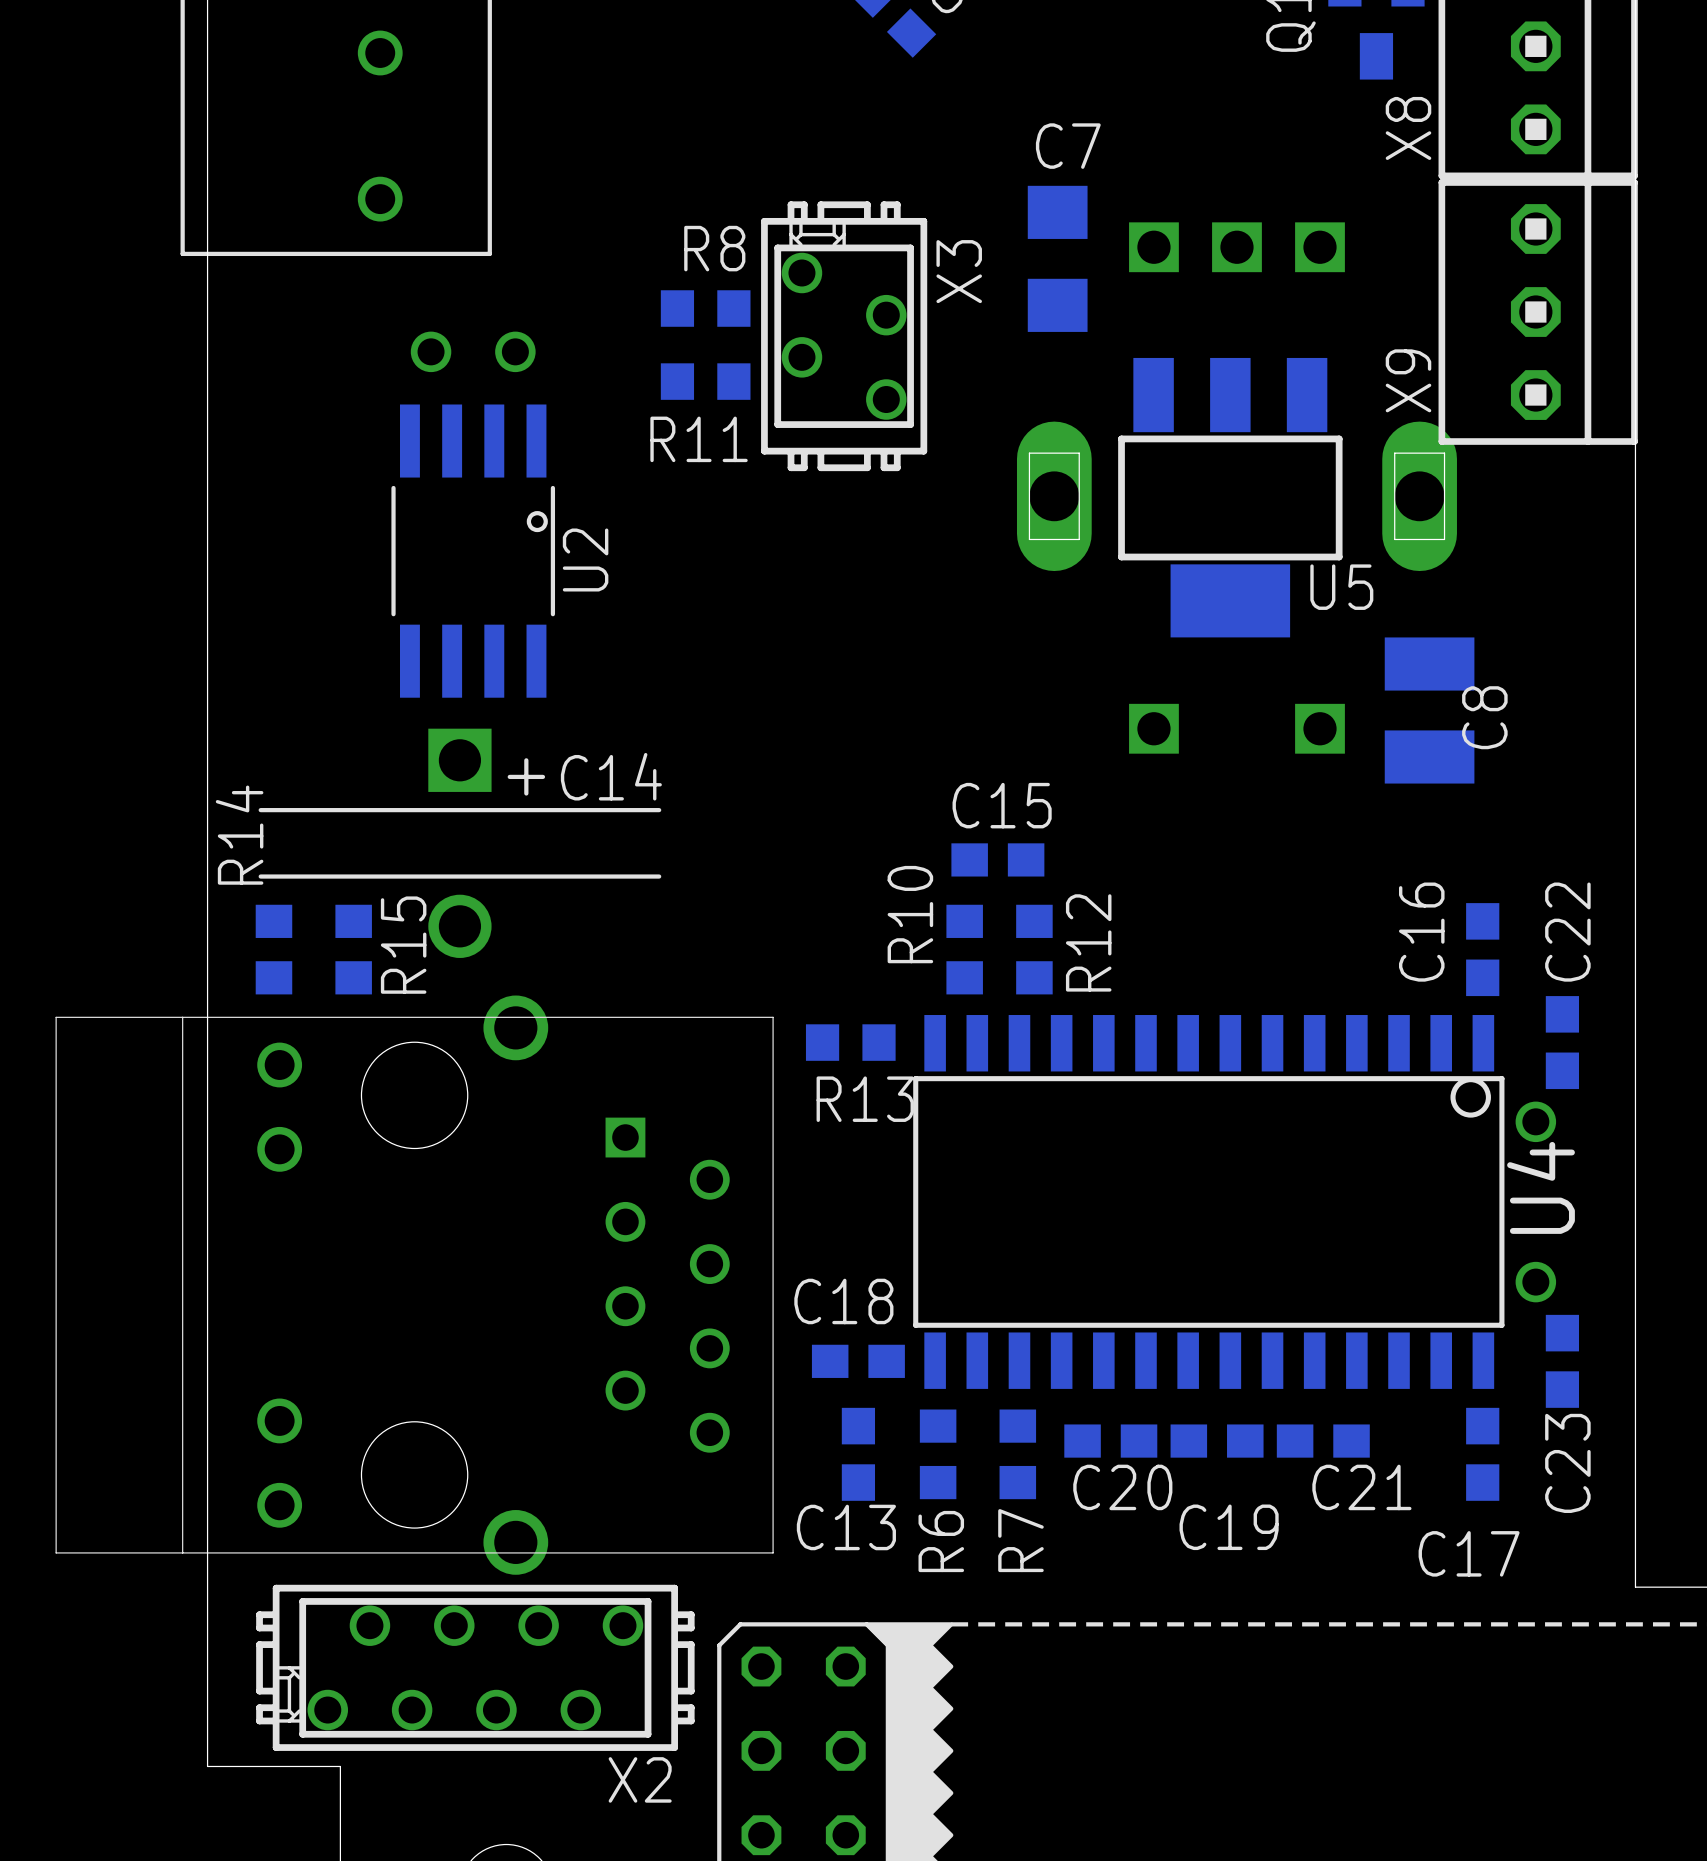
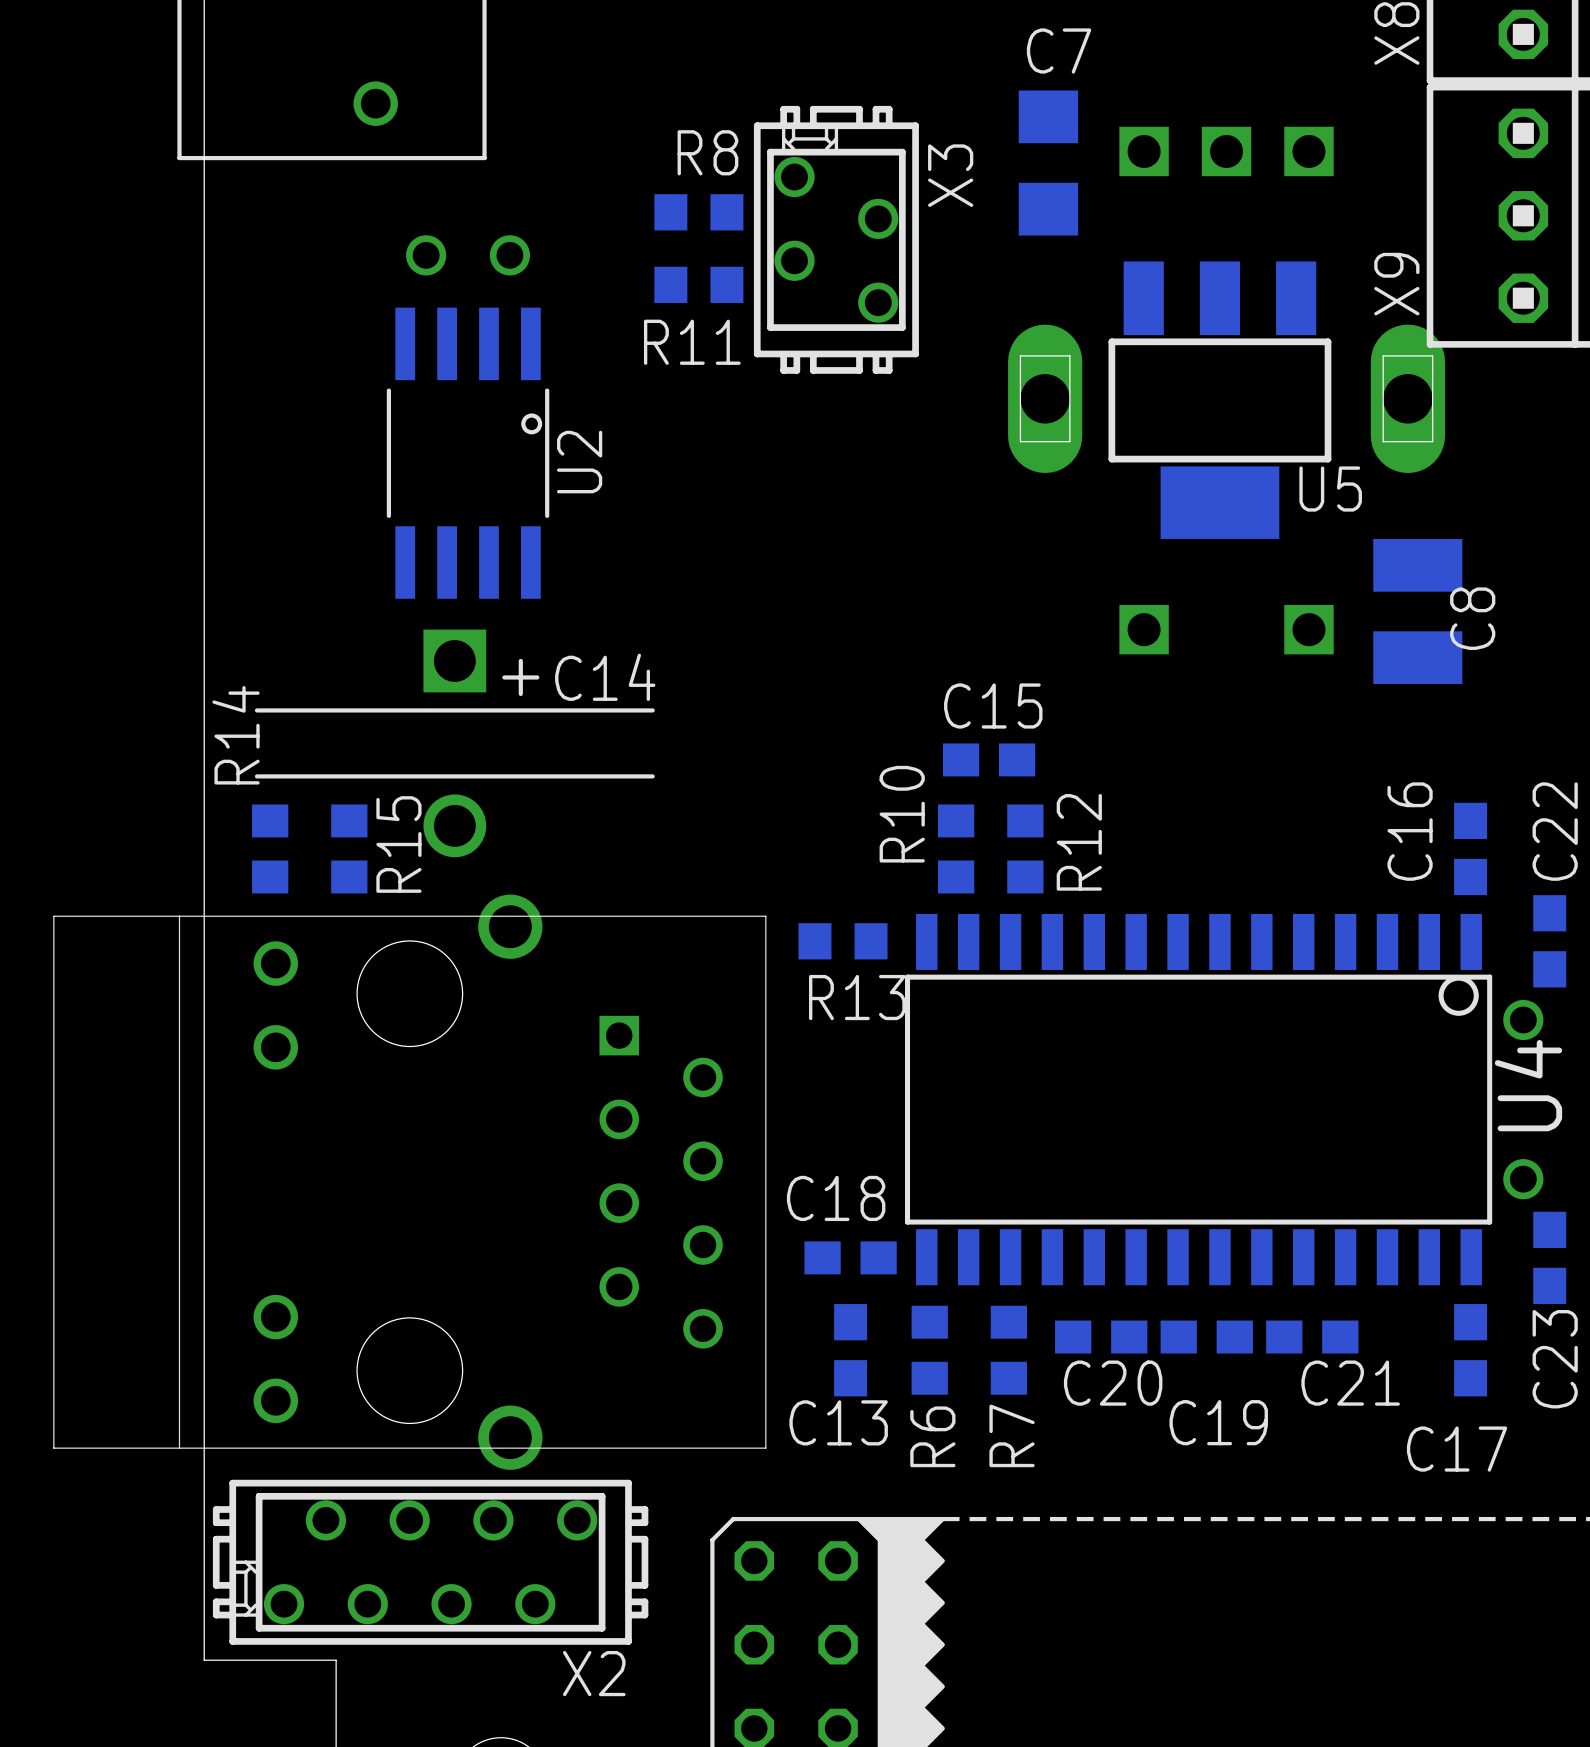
X2 position: (475, 1667) -> (430, 1562)

